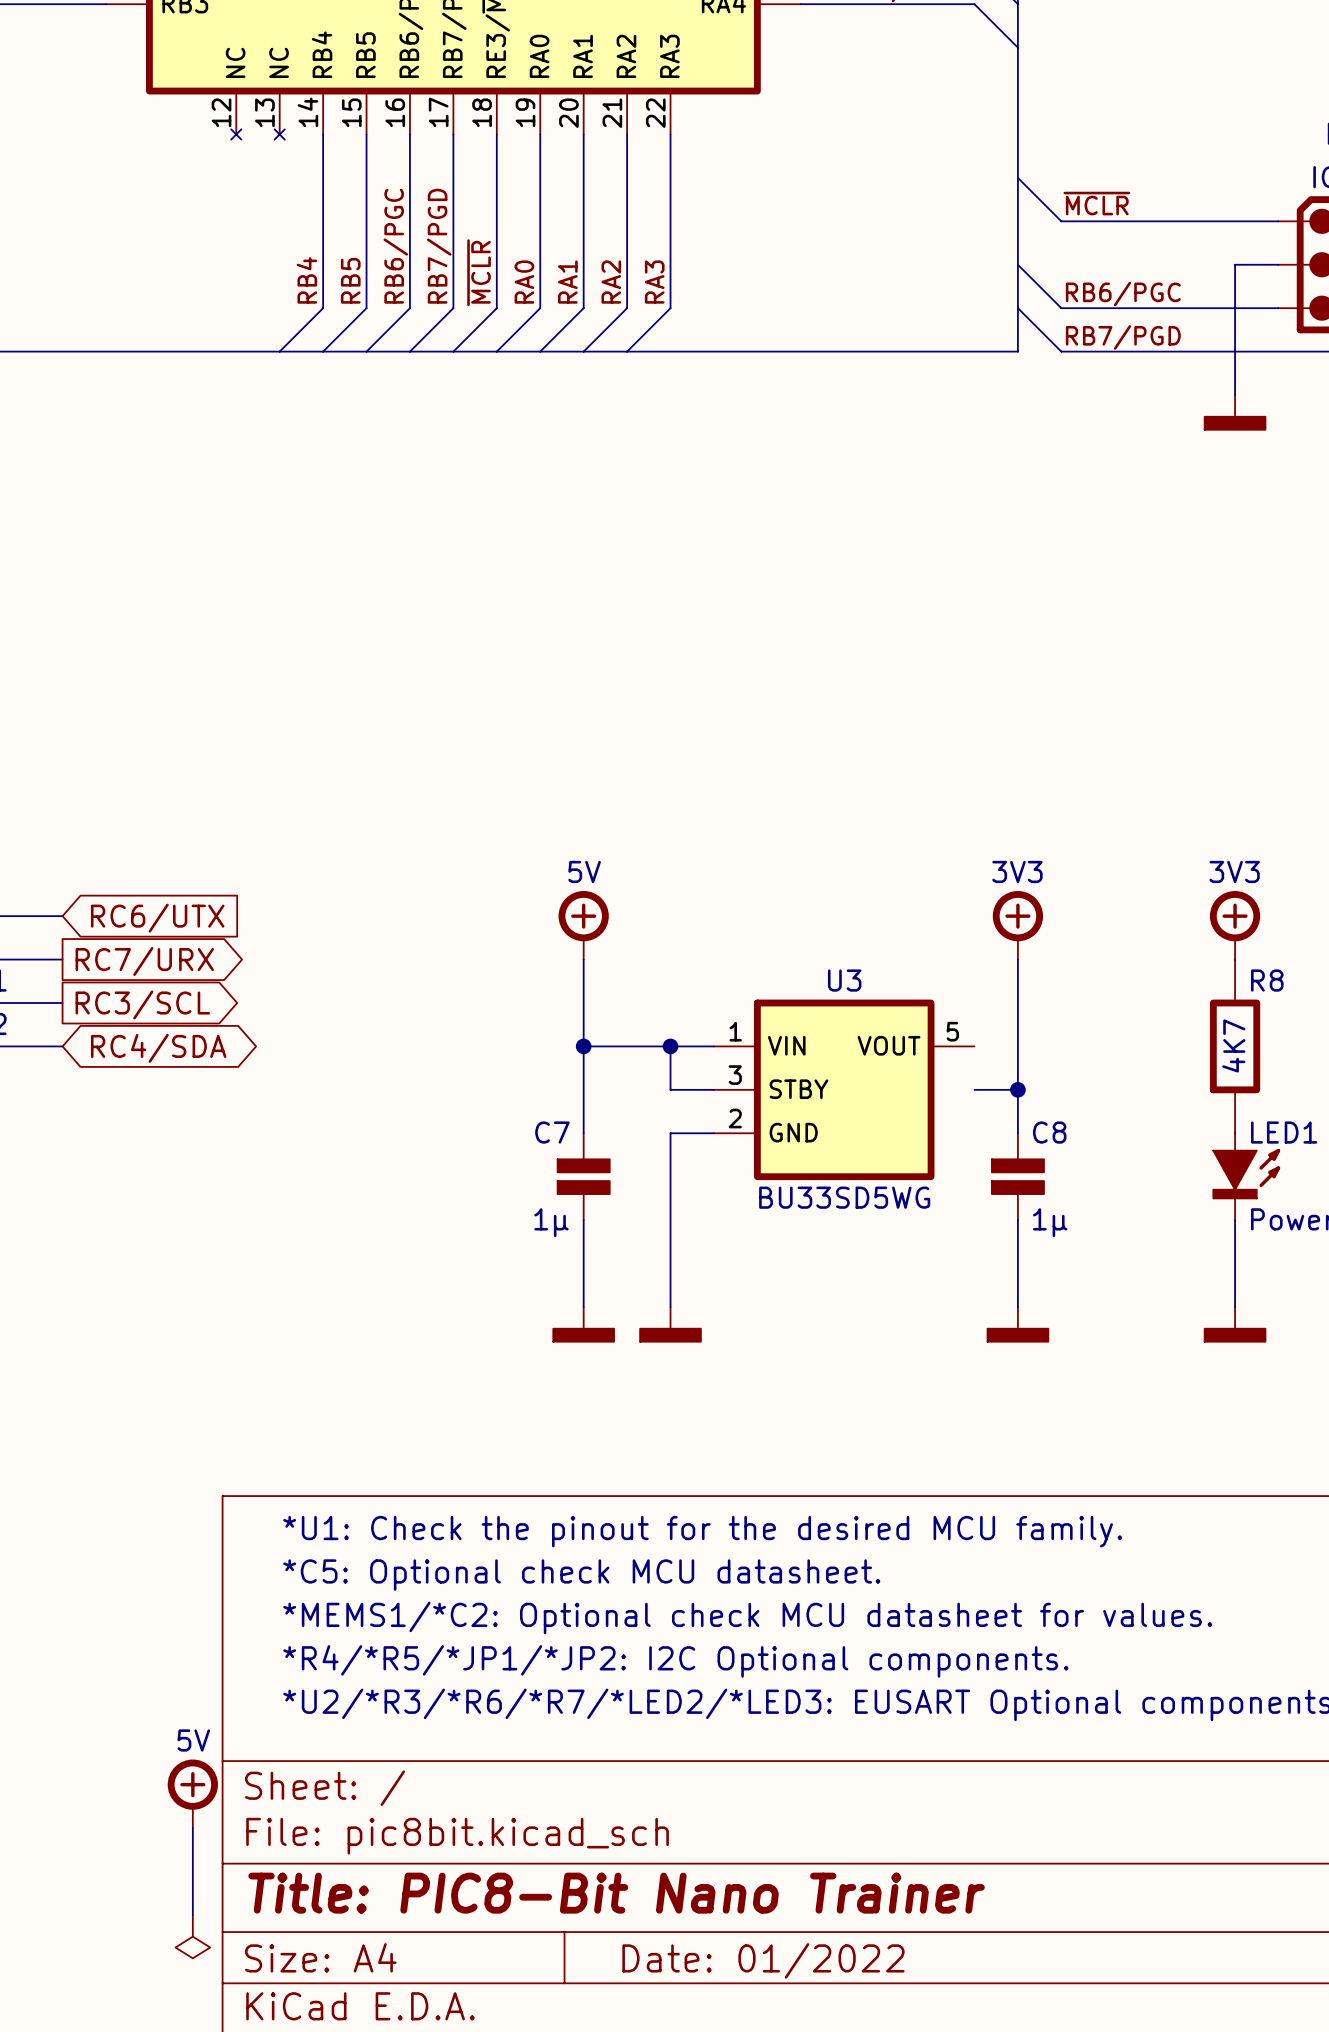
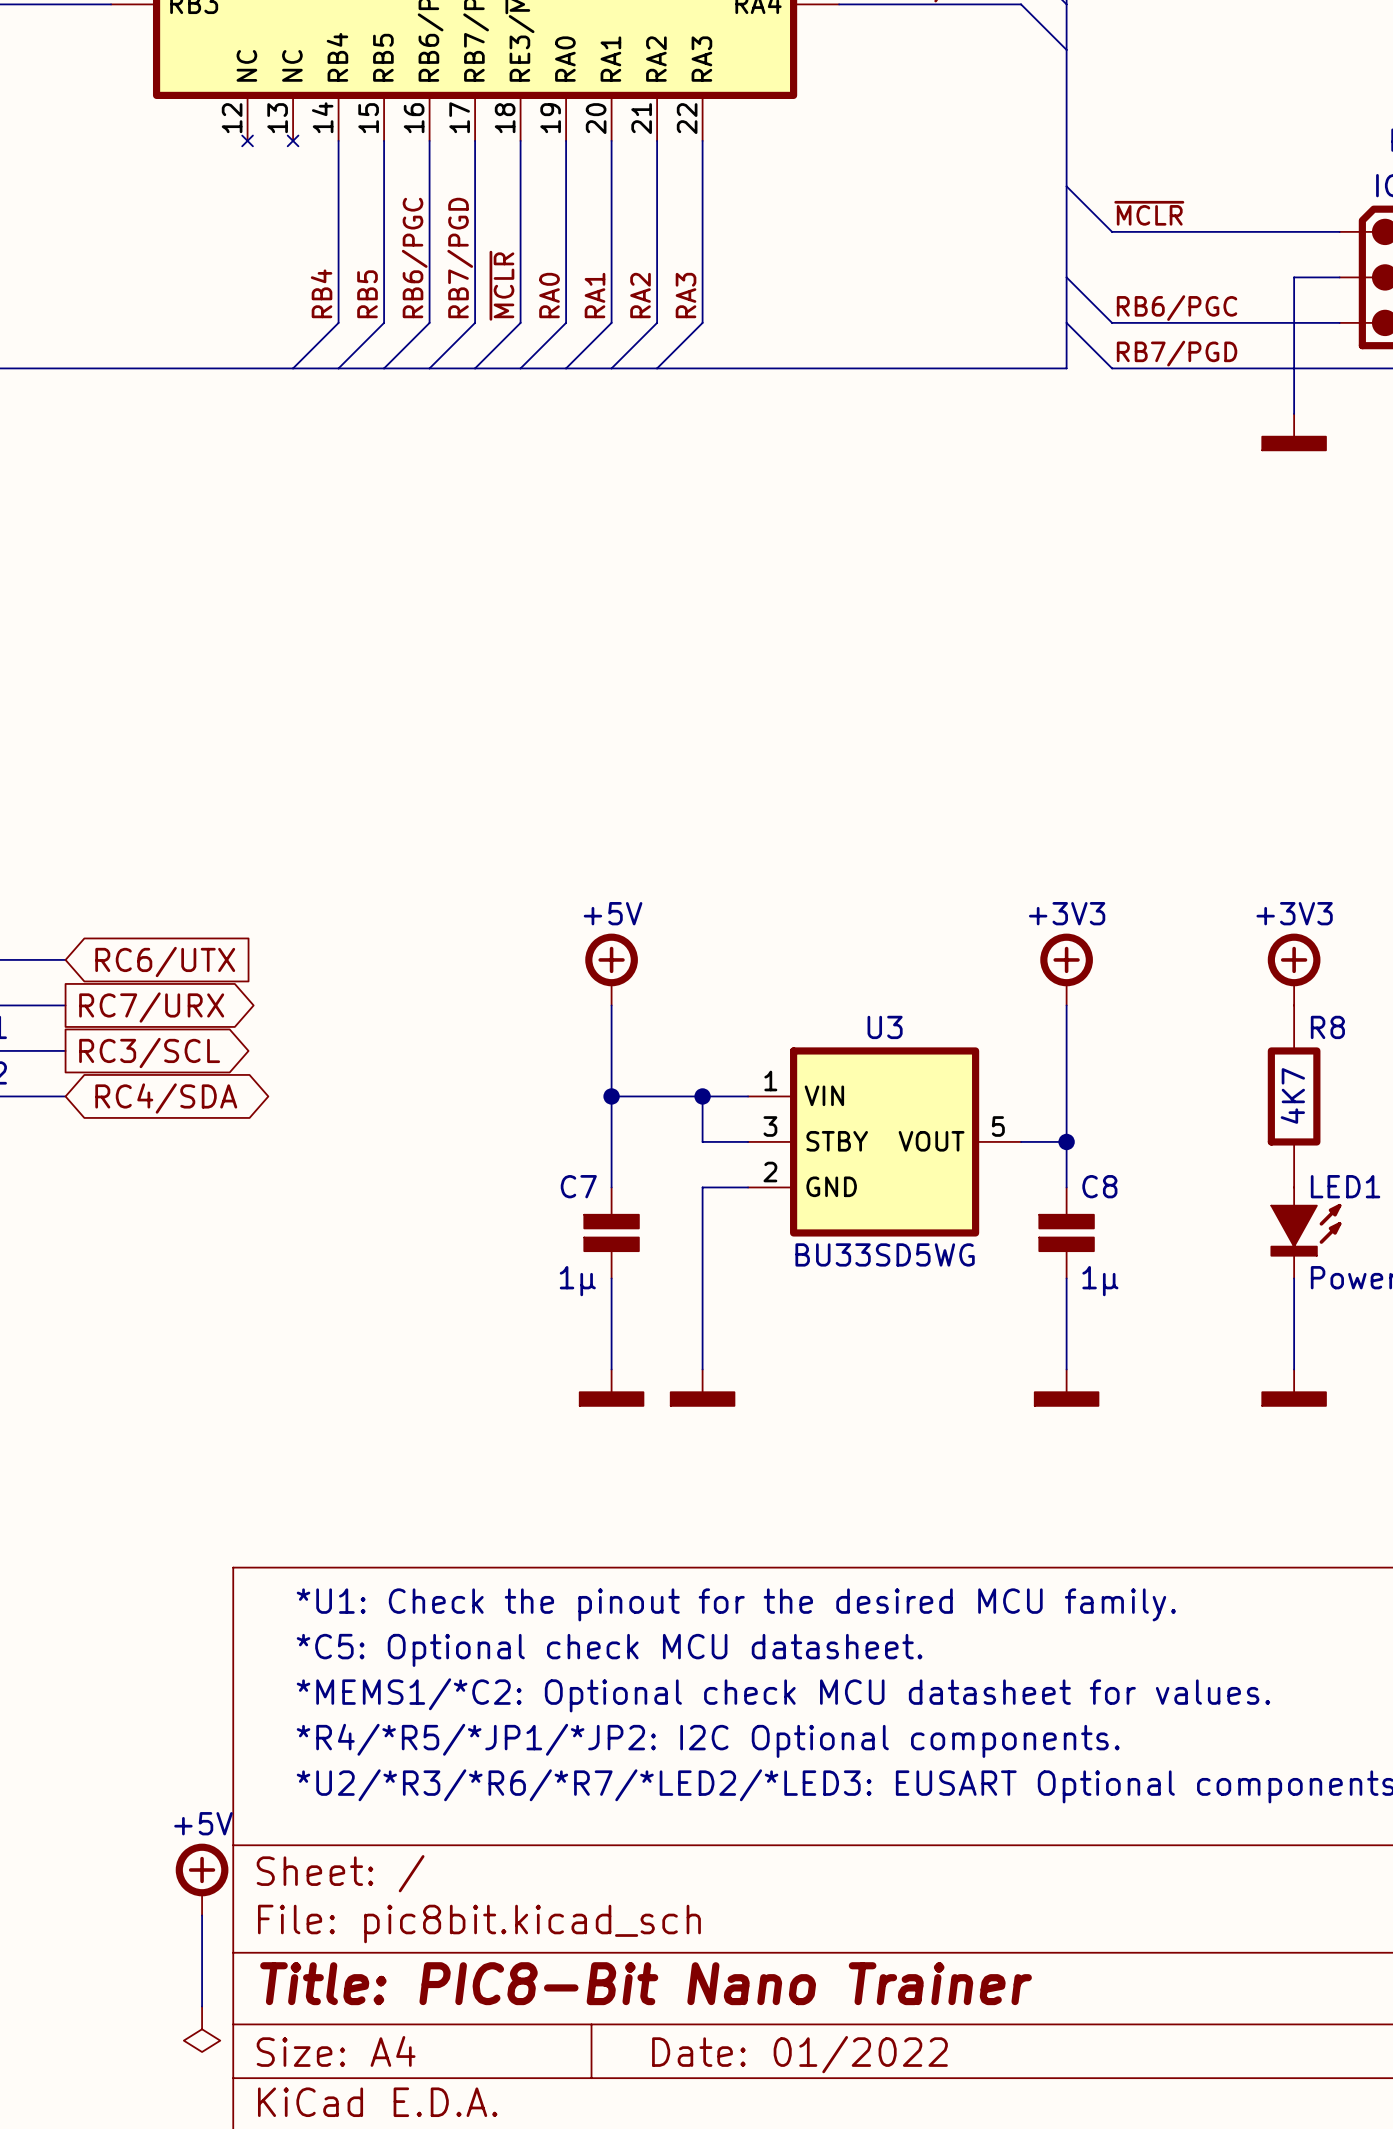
power symbol text: 5V (584, 871) -> +5V (613, 913)
power symbol text: 3V3 (1017, 871) -> +3V3 (1067, 913)
power symbol text: 3V3 (1234, 871) -> +3V3 (1294, 913)
U3 symbol: [713, 999, 975, 1181] -> [748, 1047, 1022, 1237]
power symbol text: 5V (193, 1740) -> +5V (203, 1823)

